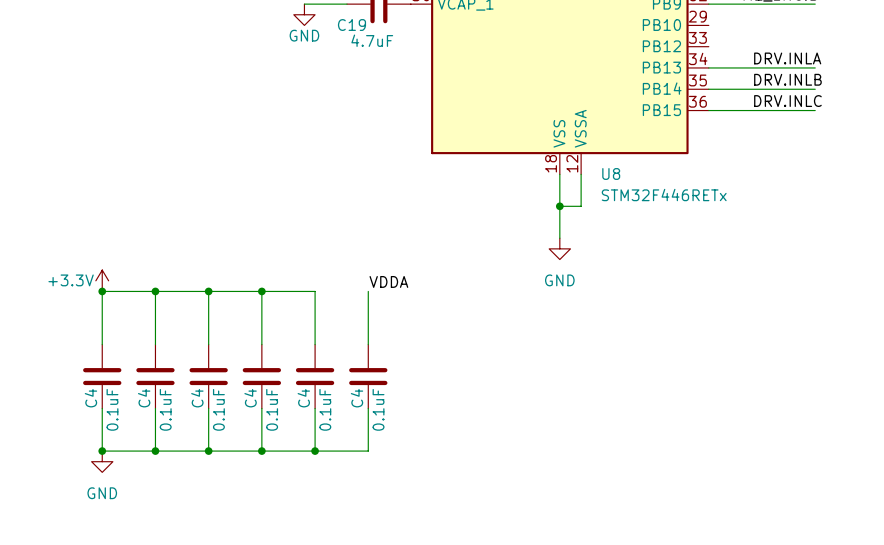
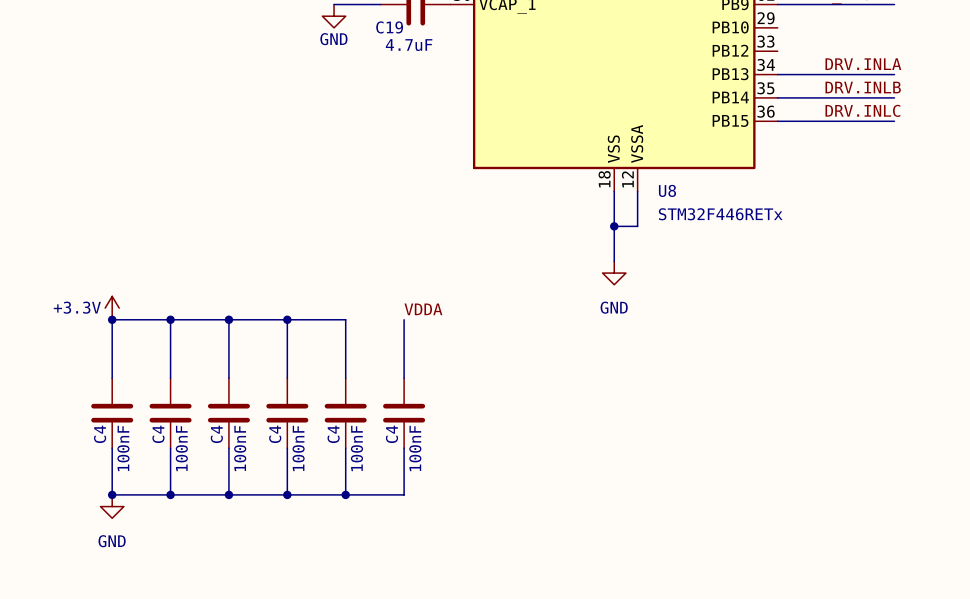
C4 value: 0.1uF (112, 409) -> 100nF (123, 448)
C4 value: 0.1uF (165, 409) -> 100nF (181, 448)
C4 value: 0.1uF (218, 409) -> 100nF (240, 448)
C4 value: 0.1uF (272, 409) -> 100nF (298, 448)
C4 value: 0.1uF (325, 409) -> 100nF (356, 448)
C4 value: 0.1uF (378, 409) -> 100nF (415, 448)

